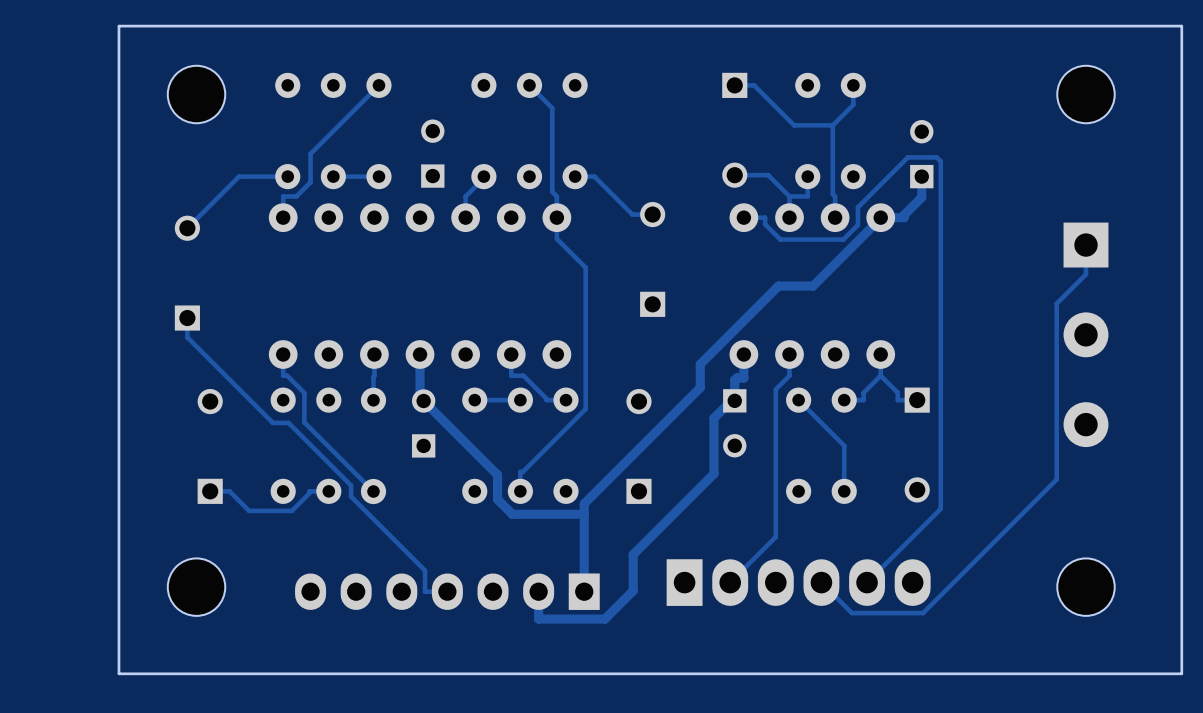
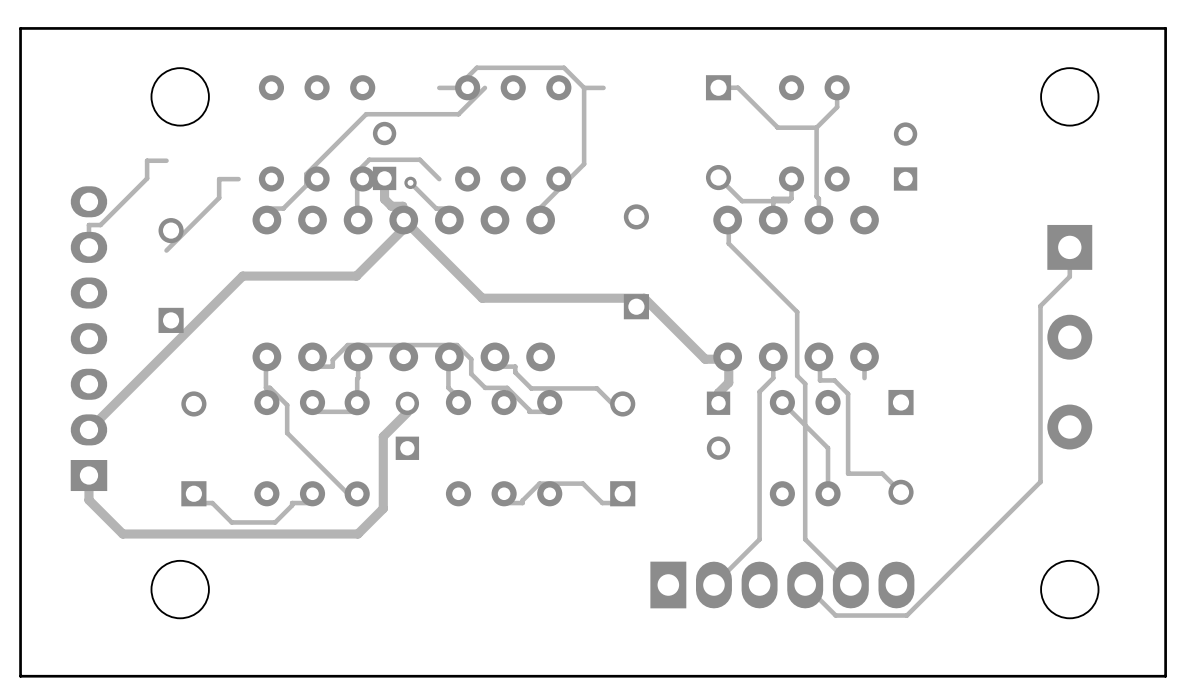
board edge: (118, 26) (118, 673) -> (102, 28) (20, 28) (20, 676) (102, 676)
track: (378, 85) (310, 153) (310, 182) (296, 196) (283, 196) (283, 217) -> none
track: none -> (484, 87) (458, 114) (366, 114) (306, 174) (306, 185) (283, 208) (265, 208) (265, 229)
track: (529, 85) (552, 108) (552, 191) (556, 196) (556, 238) (585, 267) (585, 409) (522, 471) (520, 471) (520, 491) -> none
track: none -> (584, 87) (564, 67) (476, 67) (458, 87) (439, 87)
track: none -> (584, 87) (584, 164) (539, 208) (539, 229)
track: none -> (603, 87) (584, 87)
part position: (432, 153) -> (384, 155)
track: none -> (166, 160) (147, 160) (147, 178) (100, 225) (88, 225) (88, 247)
track: (734, 175) (768, 175) (789, 196) -> (718, 177) (742, 201) (788, 201) (791, 198)
track: none -> (238, 179) (219, 179) (219, 197) (166, 250)
track: (287, 176) (239, 176) (187, 228) -> none
track: (378, 176) (333, 176) -> none
track: none -> (384, 178) (384, 199) (391, 206) (402, 206) (402, 229) (356, 276) (242, 276) (88, 429)
track: none -> (439, 179) (419, 159) (369, 159) (357, 171) (357, 229)
track: (483, 176) (465, 196) (465, 217) -> none
track: (575, 176) (594, 176) (632, 214) (652, 214) -> none
track: (921, 176) (921, 197) (904, 214) (904, 217) (880, 217) -> none
track: none -> (410, 182) (436, 208) (448, 208) (448, 229)
via: none -> (410, 182)
track: (743, 217) (765, 217) (765, 224) (780, 239) (843, 239) (857, 225) (857, 207) (907, 157) (936, 157) (940, 161) (940, 508) (867, 582) -> (728, 222) (728, 243) (797, 312) (797, 375) (805, 383) (805, 539) (850, 585)
track: (881, 217) (813, 286) (778, 286) (700, 364) (700, 387) (584, 503) (584, 591) -> none
track: (187, 318) (187, 337) (272, 422) (288, 422) (351, 485) (351, 496) (425, 570) (425, 591) (447, 591) -> none
track: (283, 354) (283, 375) (287, 375) (304, 392) (304, 422) (373, 491) -> none
track: (420, 354) (420, 397) (497, 474) (497, 499) (512, 514) (584, 514) -> none
track: (511, 354) (511, 375) (523, 375) (546, 400) (565, 400) -> none
track: (743, 354) (743, 378) (736, 378) (734, 380) (734, 390) -> (402, 218) (482, 298) (644, 298) (705, 359) (728, 359) (728, 382) (718, 392)
track: none -> (820, 359) (820, 380) (834, 380) (848, 393) (848, 473) (882, 473) (901, 492)
track: none -> (265, 366) (265, 387) (269, 387) (287, 405) (287, 433) (357, 503)
track: none -> (311, 366) (332, 366) (332, 360) (347, 345) (457, 345) (471, 359) (471, 373) (485, 387) (507, 387) (529, 411) (548, 411)
track: none -> (448, 366) (448, 387) (452, 392) (457, 392) (457, 411)
track: none -> (494, 366) (515, 366) (515, 372) (531, 388) (597, 388) (621, 413)
track: (734, 397) (713, 418) (713, 473) (633, 554) (633, 590) (604, 619) (538, 619) (538, 591) -> none
track: (520, 400) (474, 400) -> (357, 411) (311, 411)
track: (917, 400) (897, 400) (897, 392) (880, 375) (863, 392) (863, 400) (844, 400) -> none
track: none -> (407, 412) (383, 436) (383, 508) (357, 534) (122, 534) (88, 500) (88, 475)
track: (328, 491) (309, 491) (291, 510) (249, 510) (229, 491) (210, 491) -> none
track: none -> (311, 503) (292, 503) (292, 505) (275, 522) (231, 522) (212, 503) (192, 503)
track: none -> (621, 503) (602, 503) (582, 483) (539, 483) (522, 500) (522, 503) (503, 503)
part rotation: 0° (447, 591) -> 90° clockwise (88, 338)
part position: (447, 591) -> (88, 338)

